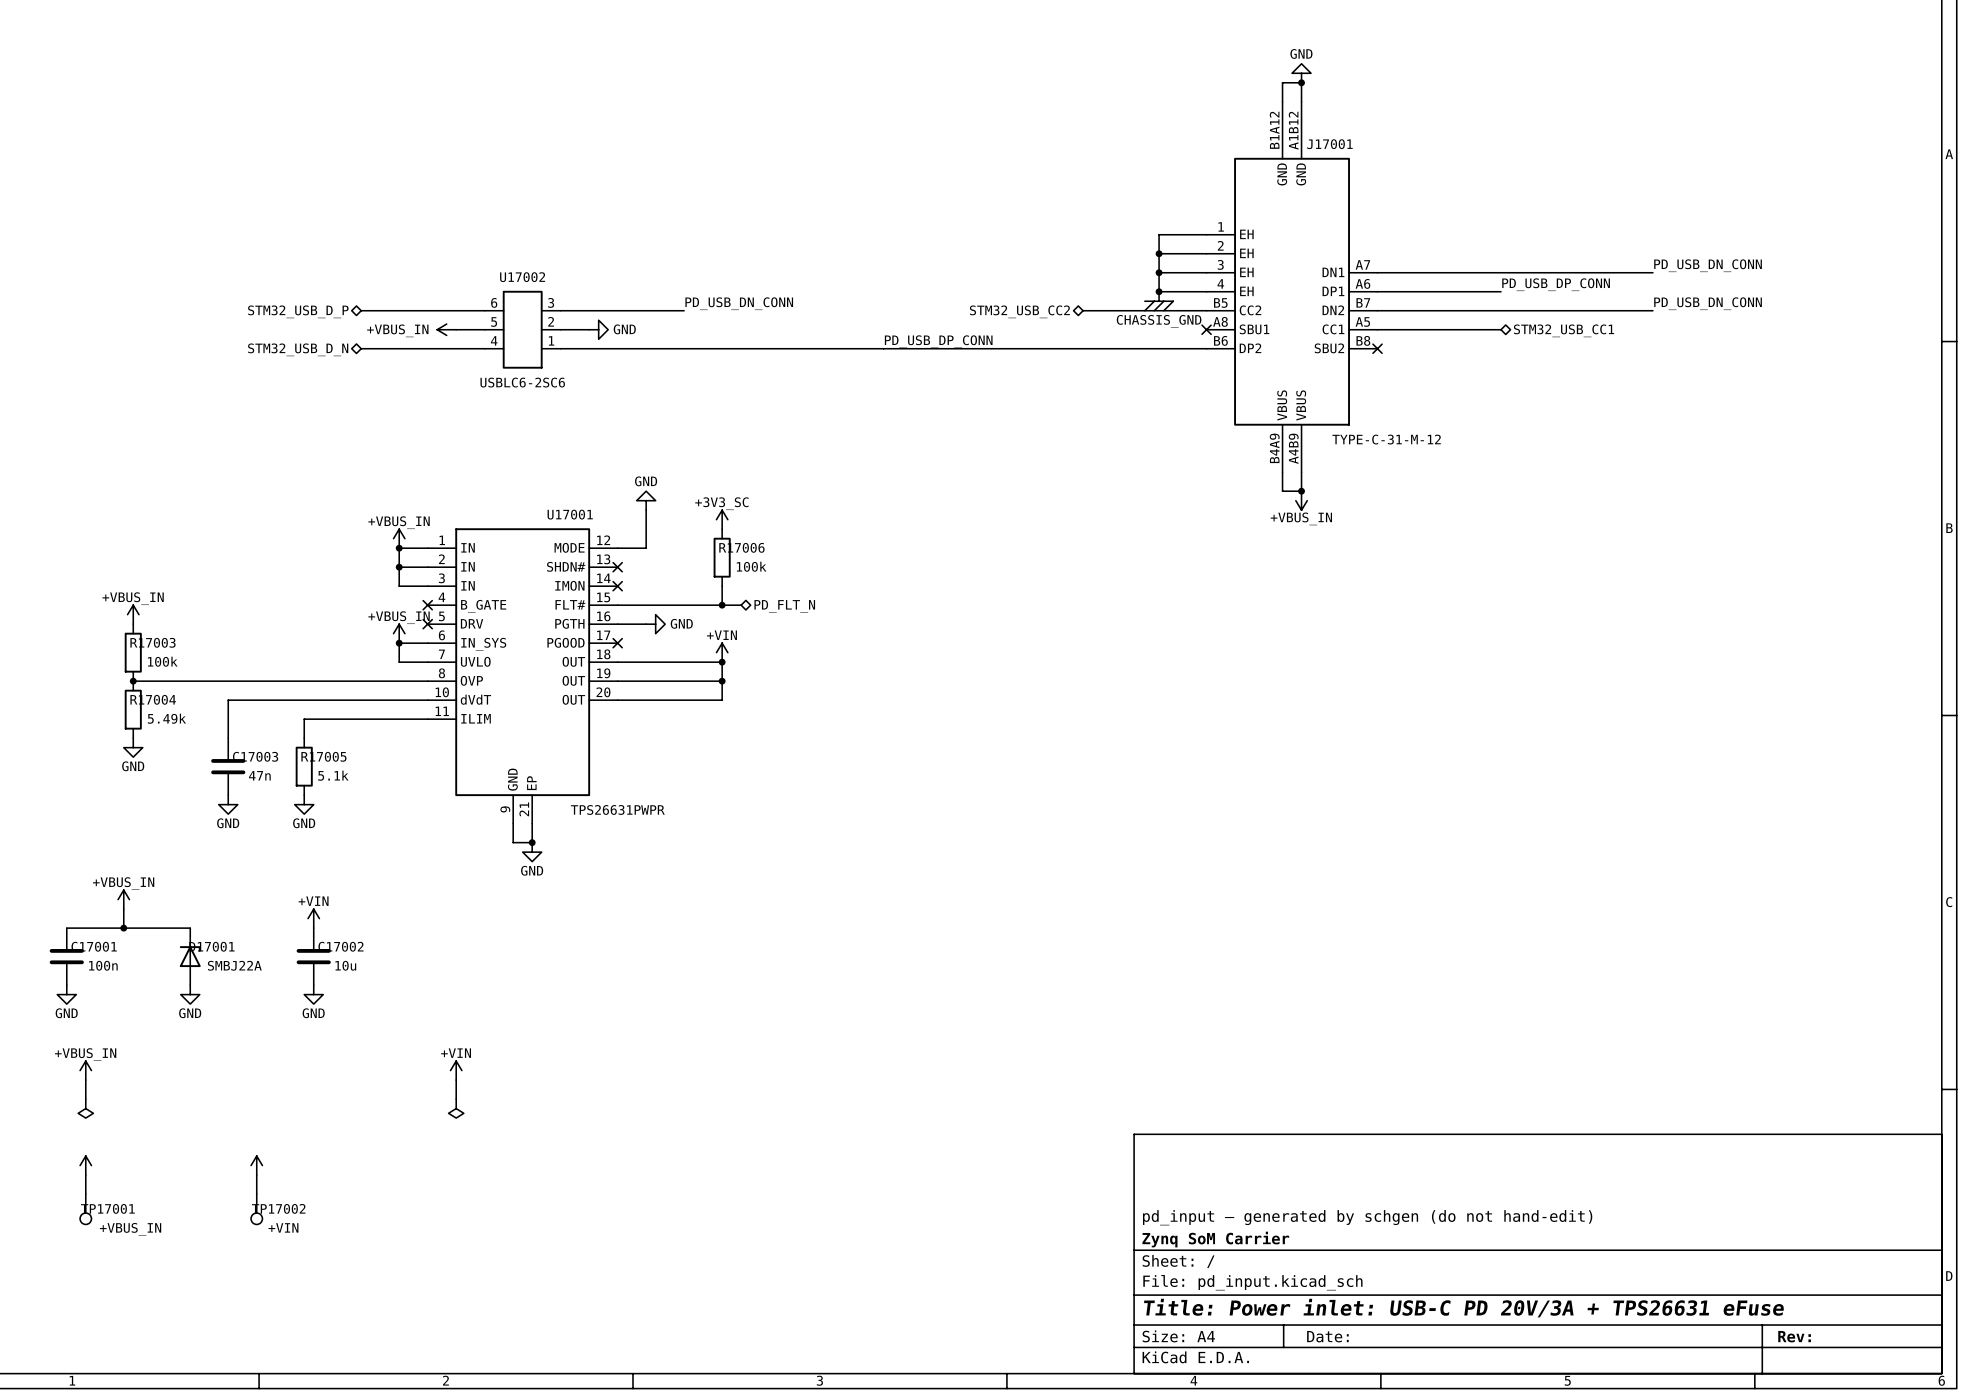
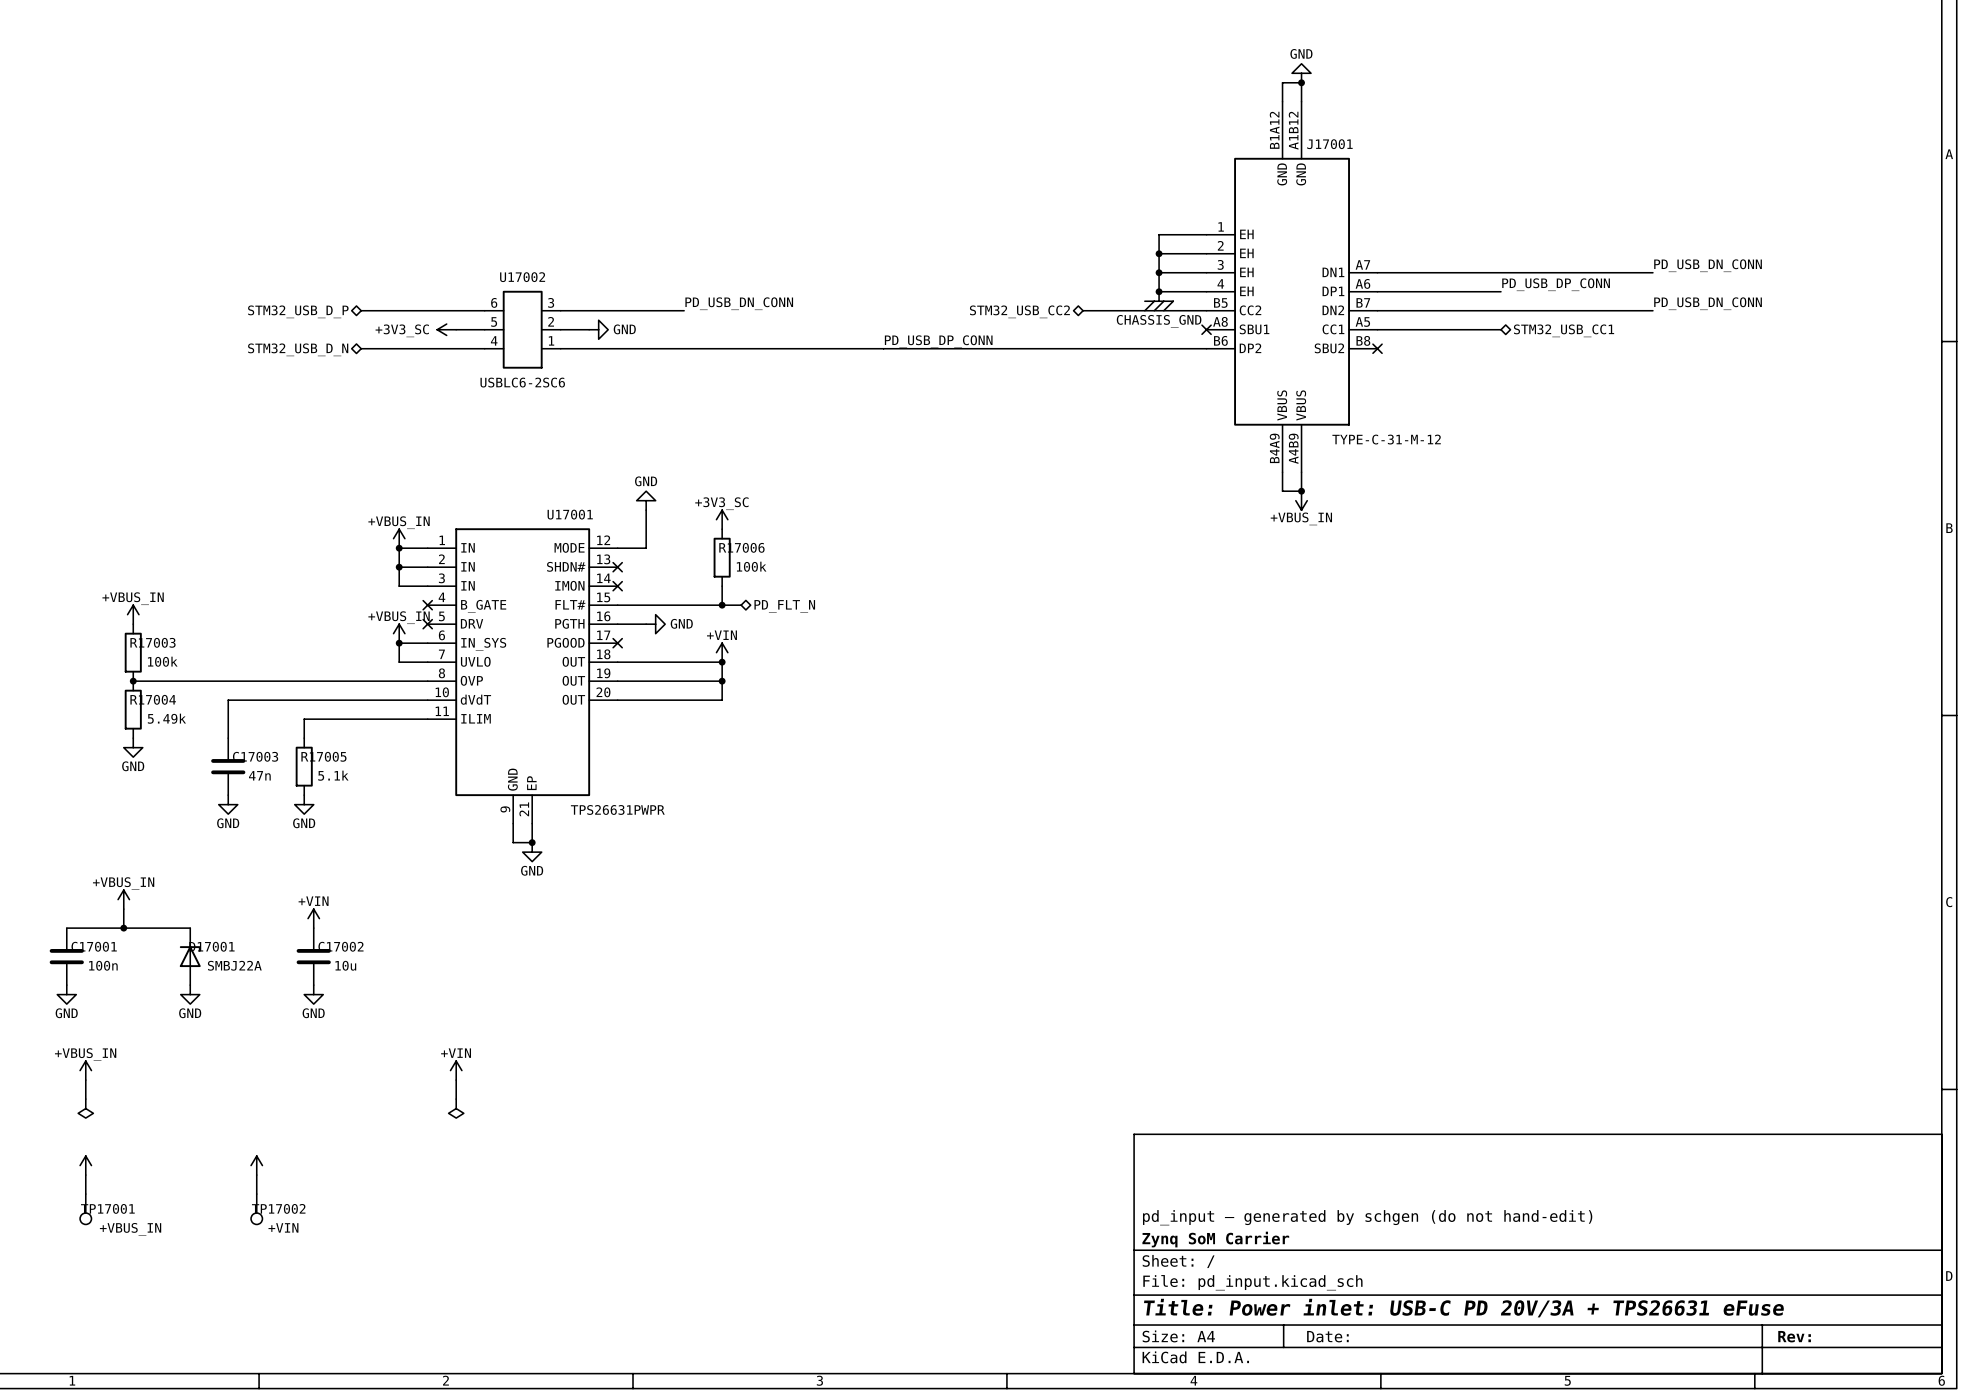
power symbol: +VBUS_IN (446, 329) -> +3V3_SC (446, 329)

